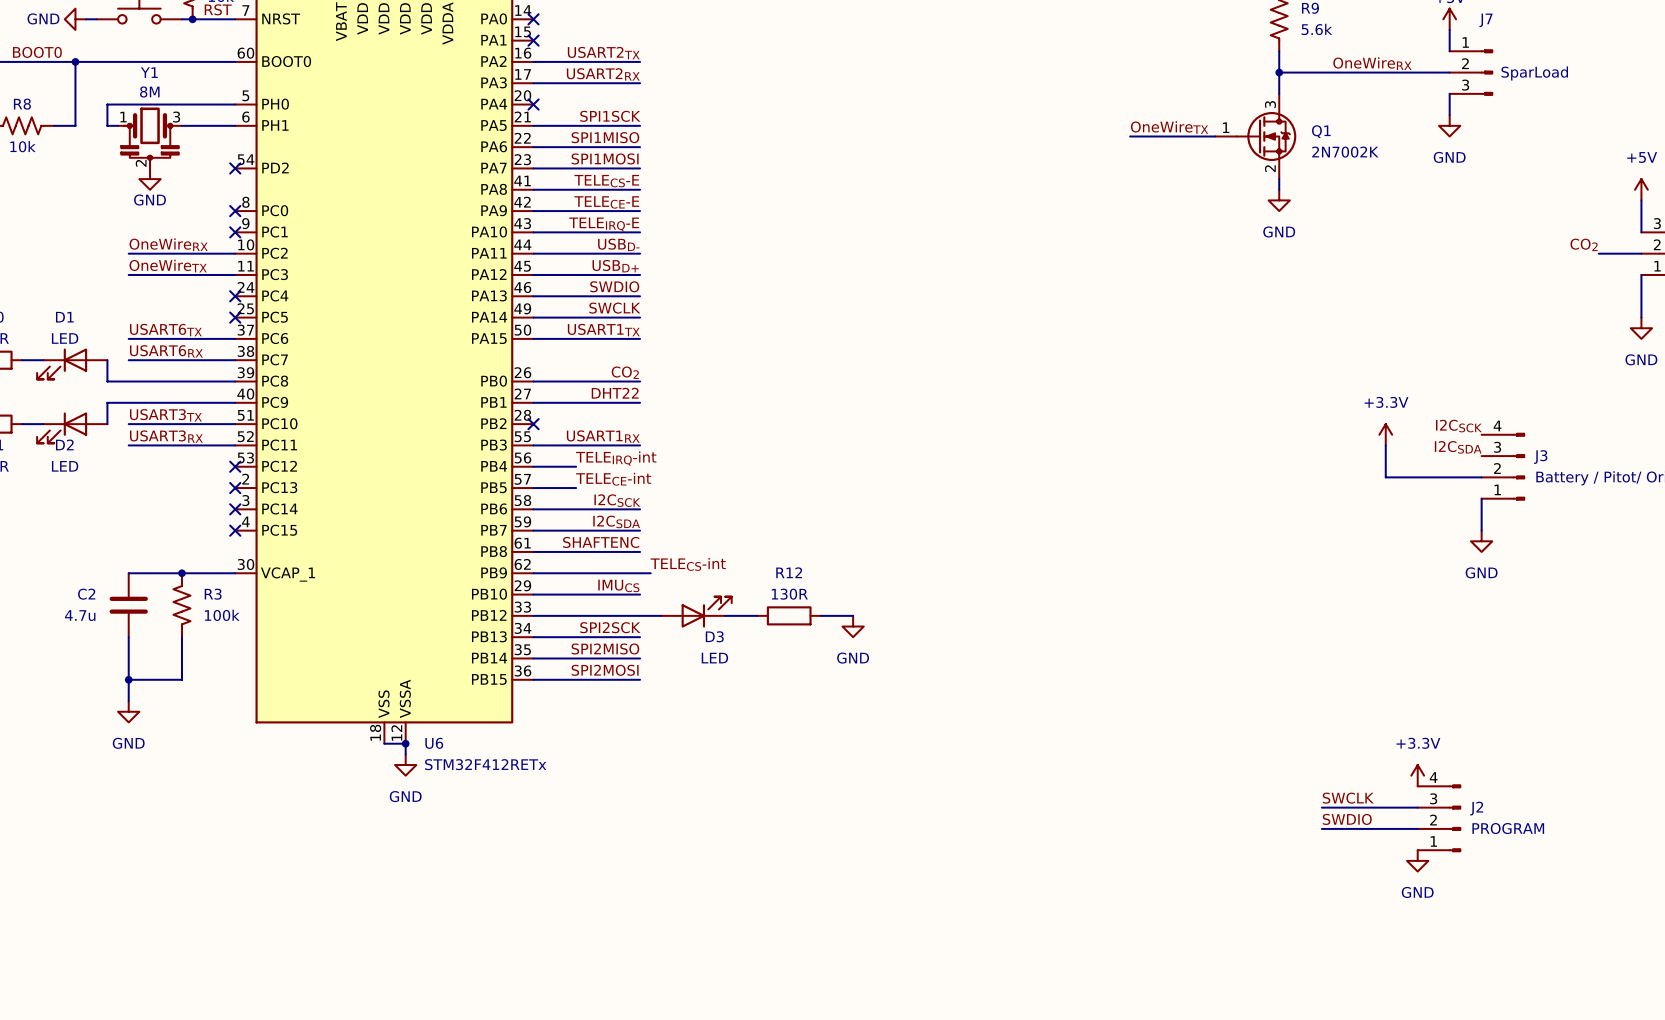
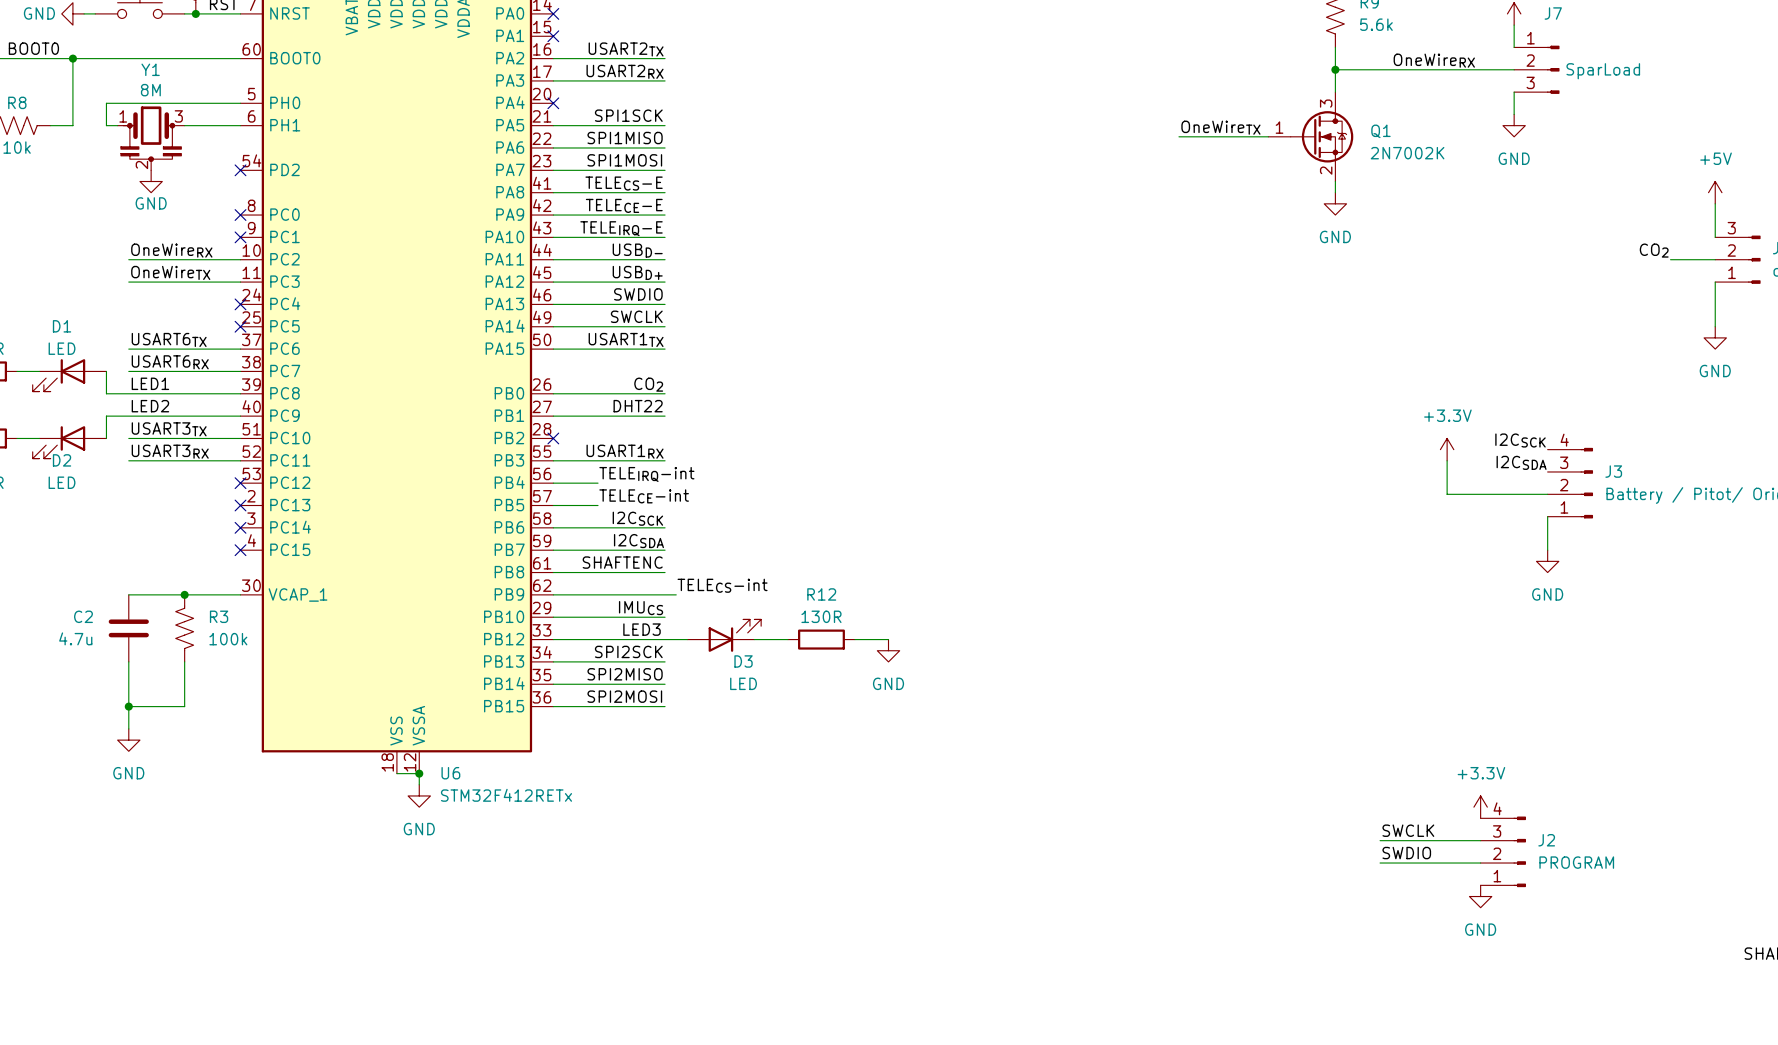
label: none -> LED1 (150, 383)
label: none -> LED2 (150, 406)
label: none -> LED3 (642, 629)

